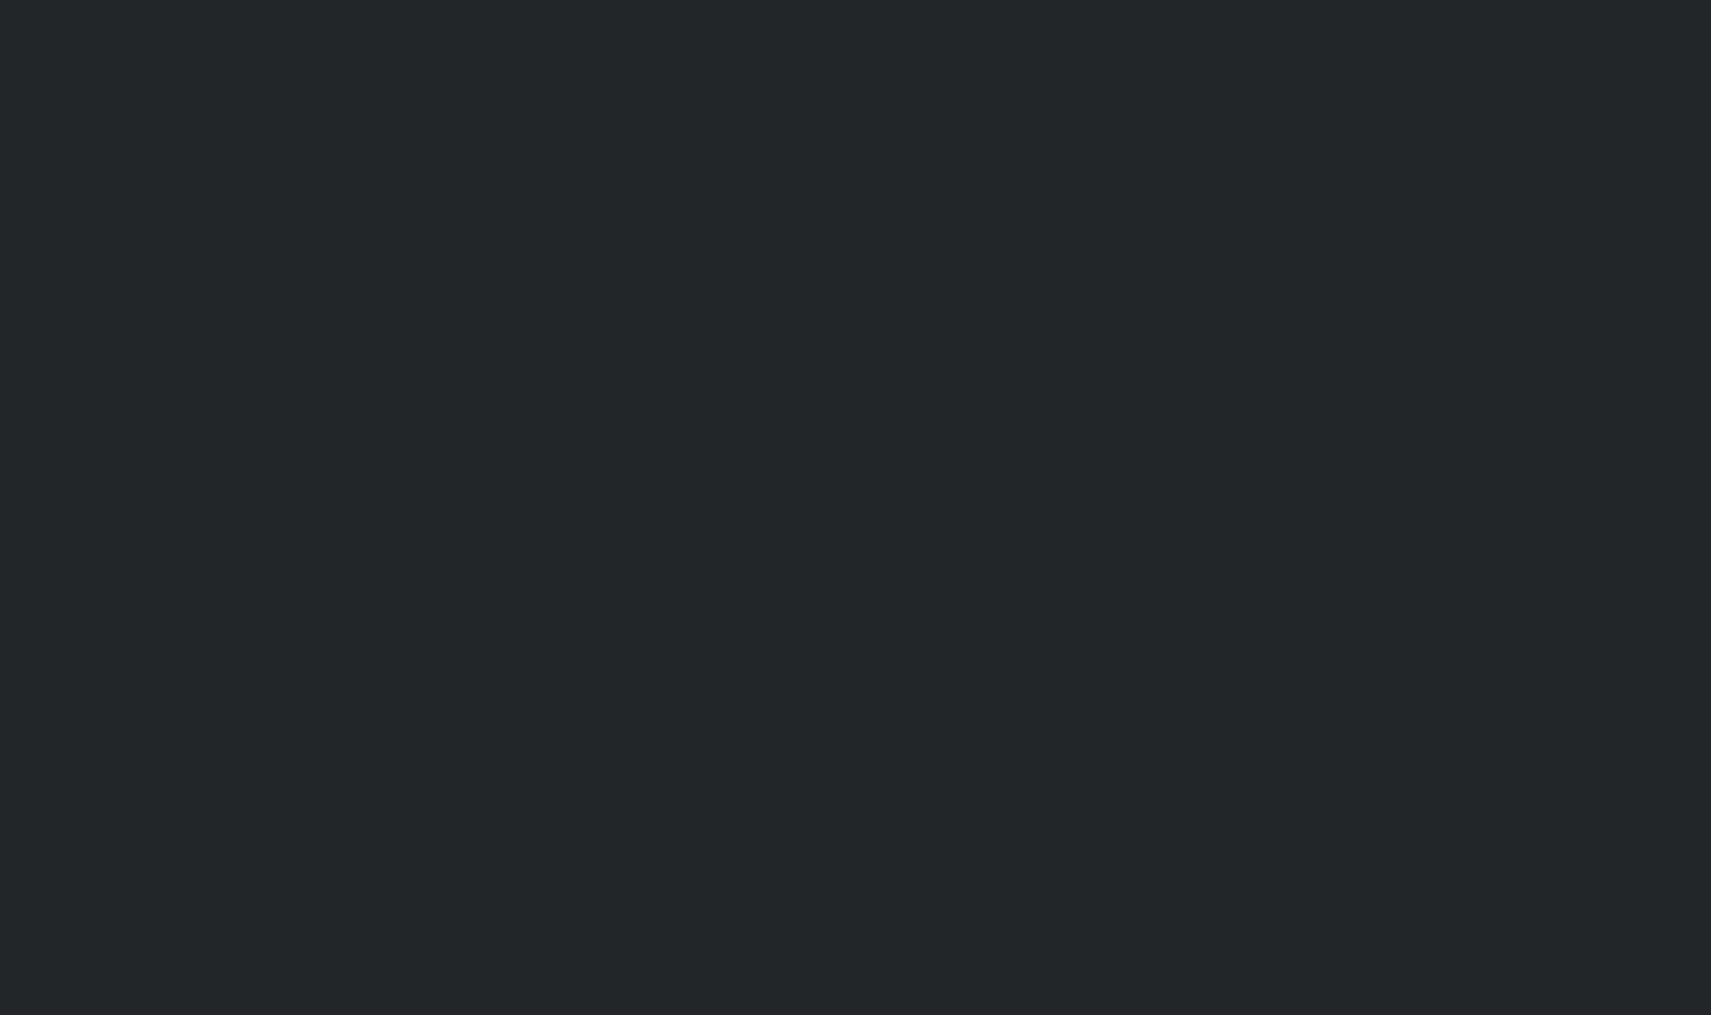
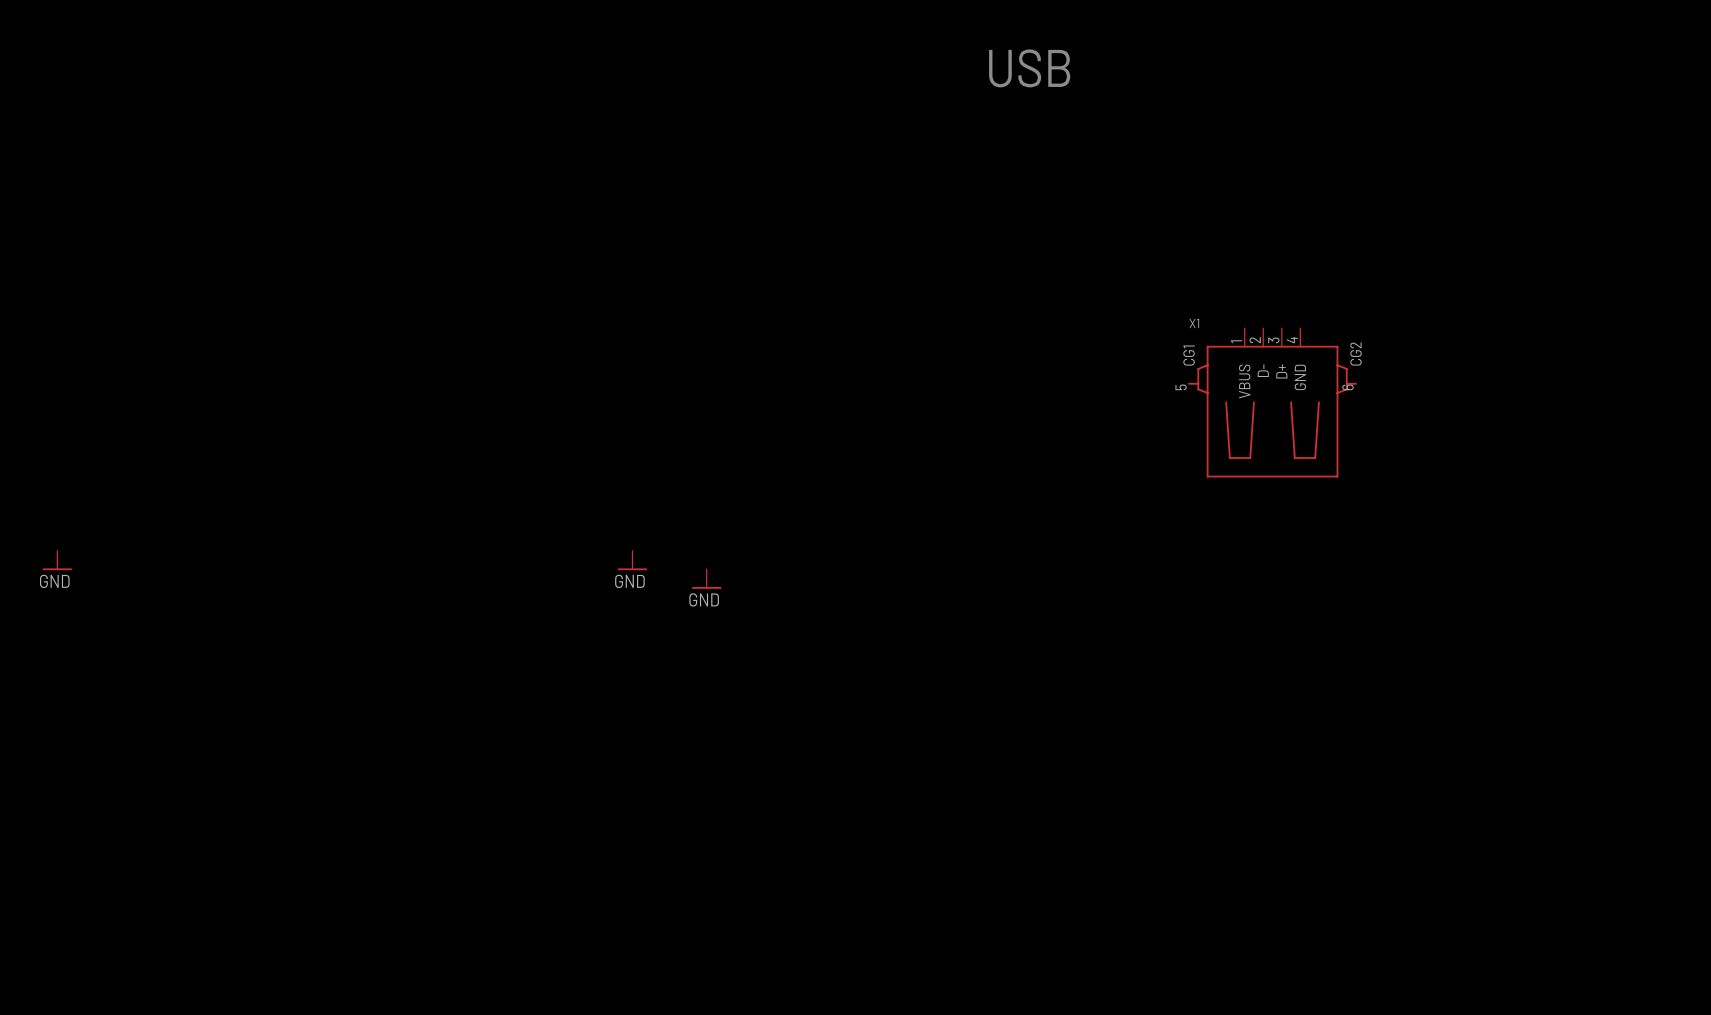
text: none -> USB (1029, 68)
X1: none -> (1272, 402)
power symbol: none -> GND (57, 560)
power symbol: none -> GND (632, 560)
power symbol: none -> GND (706, 579)

